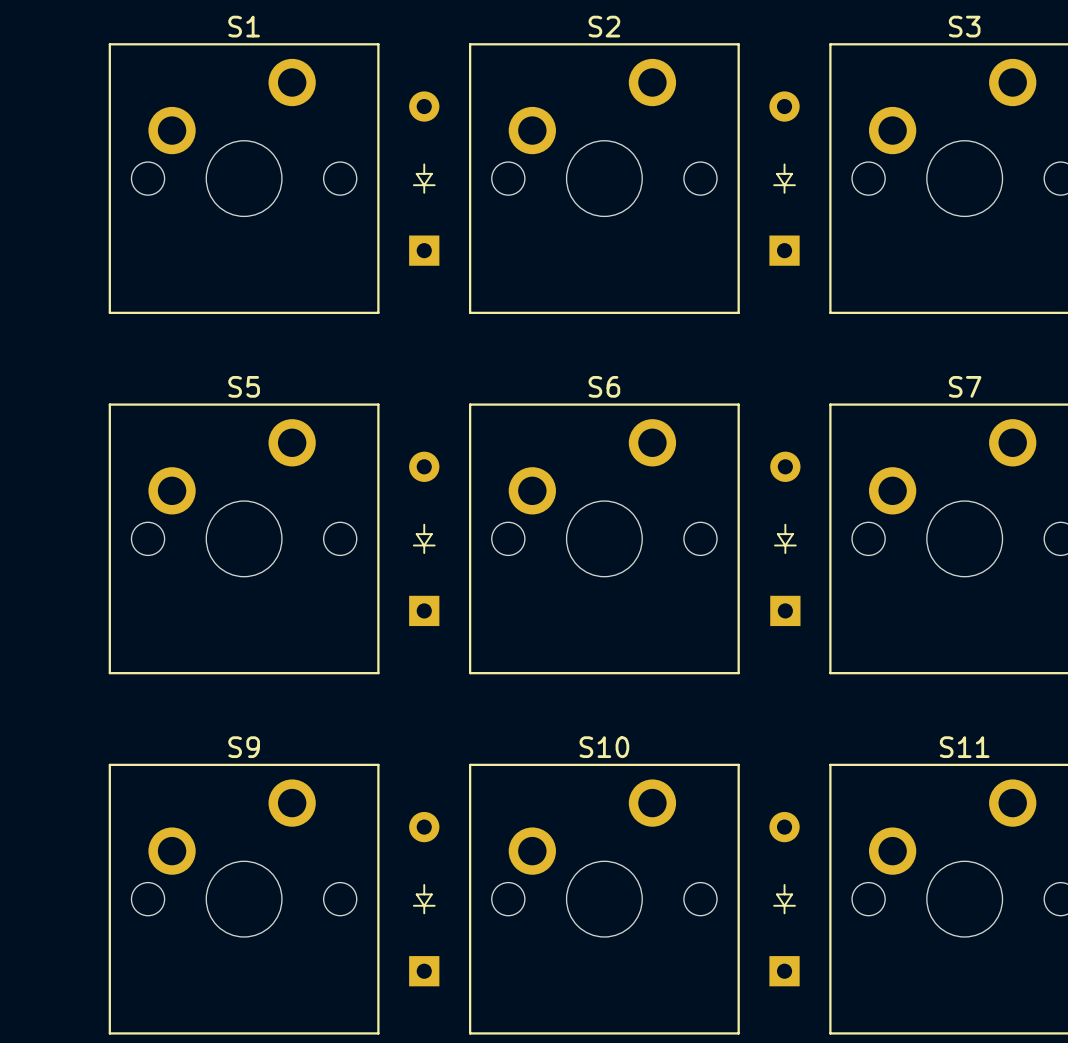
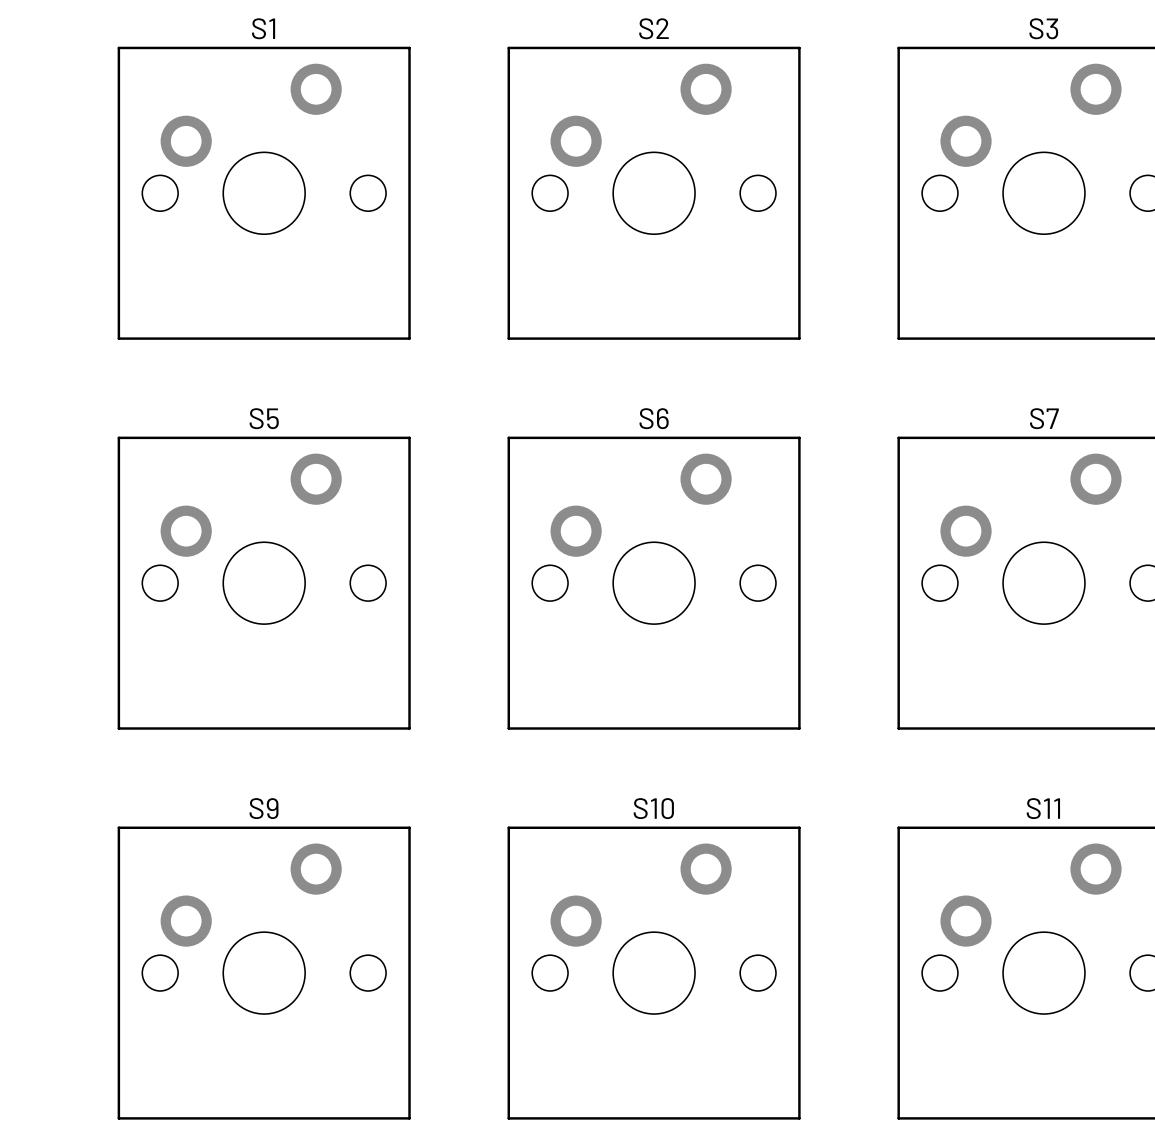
part: (424, 178) -> none
part: (784, 178) -> none
part: (424, 538) -> none
part: (785, 538) -> none
part: (424, 899) -> none
part: (784, 899) -> none

